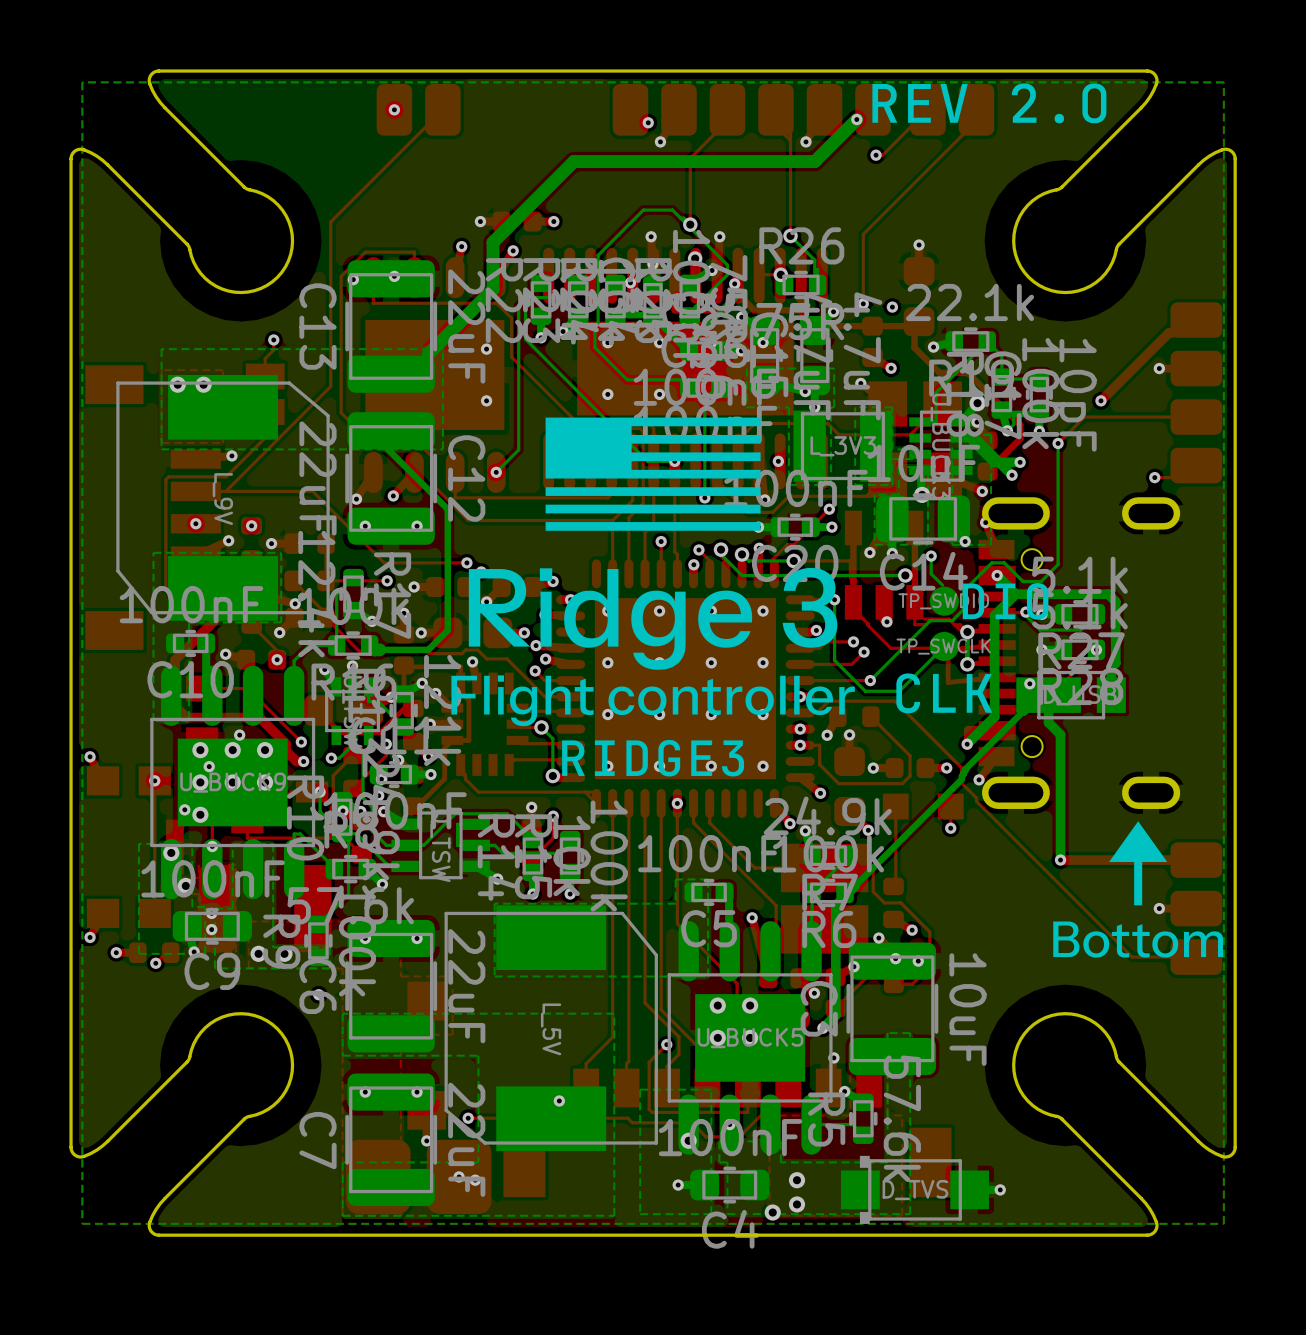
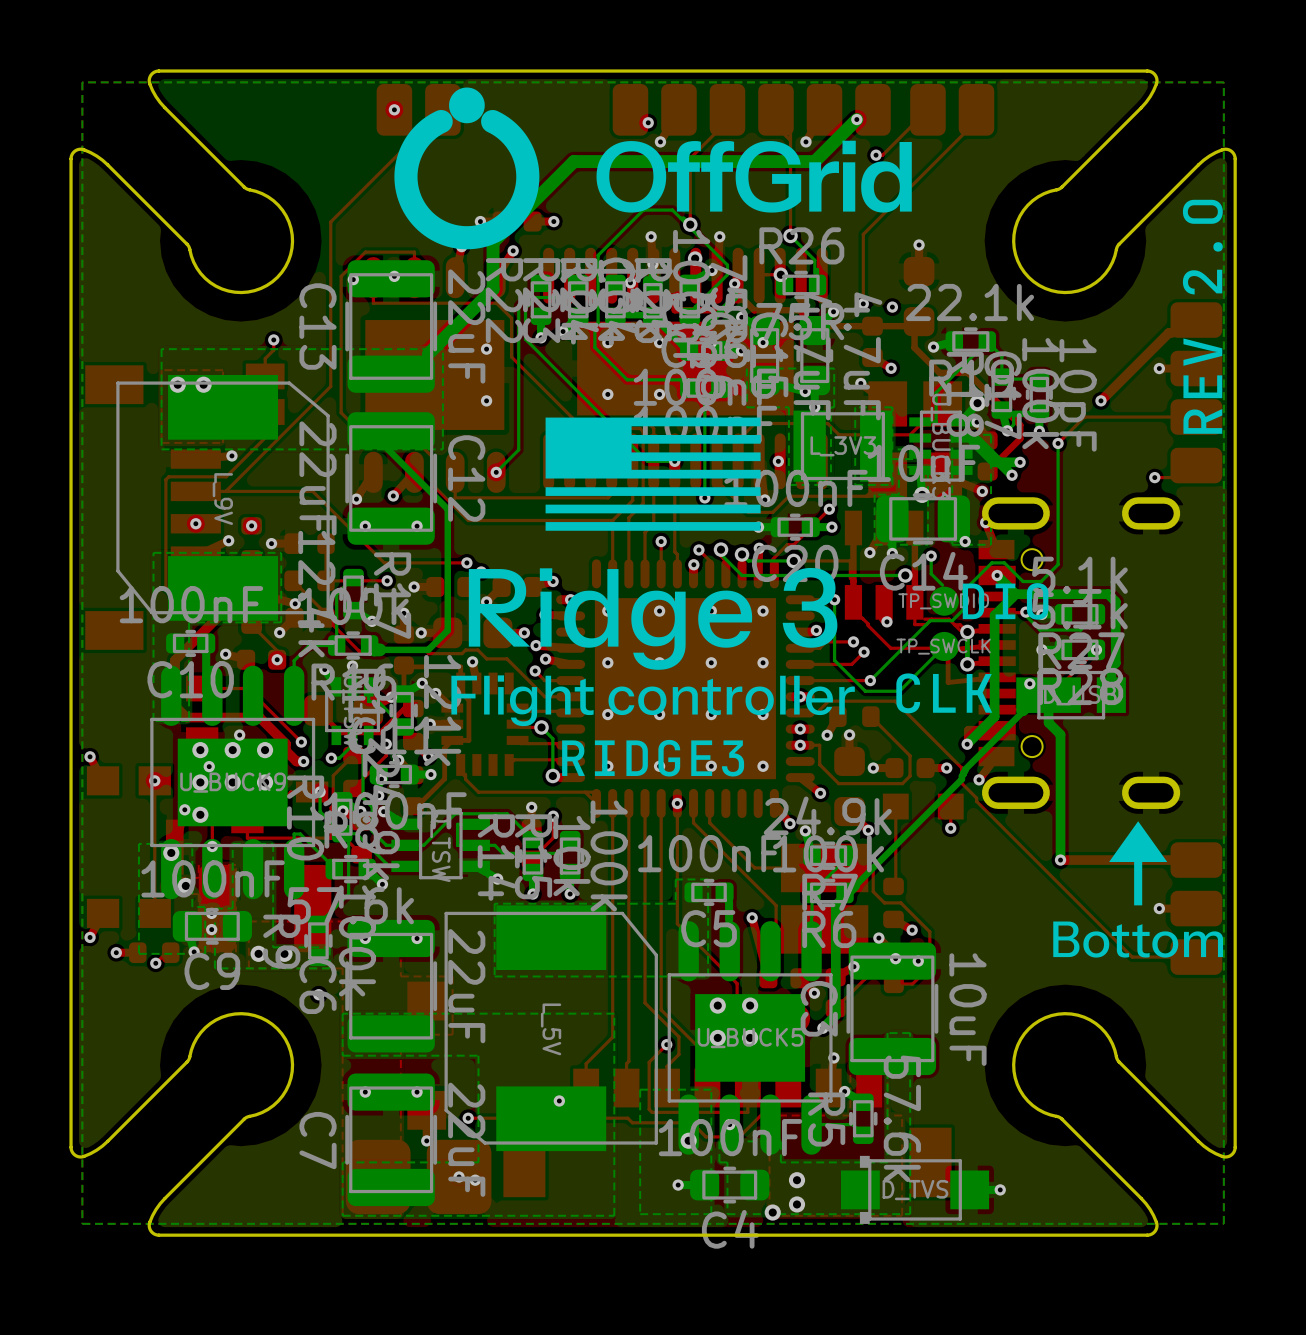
drawing: [872, 83, 968, 123] -> none
drawing: [1011, 83, 1037, 123] -> none
drawing: [1082, 83, 1107, 124] -> none
drawing: none -> [394, 87, 540, 250]
drawing position: (1059, 118) -> (1218, 246)
drawing: none -> [596, 140, 912, 213]
drawing: none -> [1182, 199, 1223, 224]
drawing: none -> [1182, 269, 1223, 295]
drawing: none -> [1183, 338, 1223, 434]

